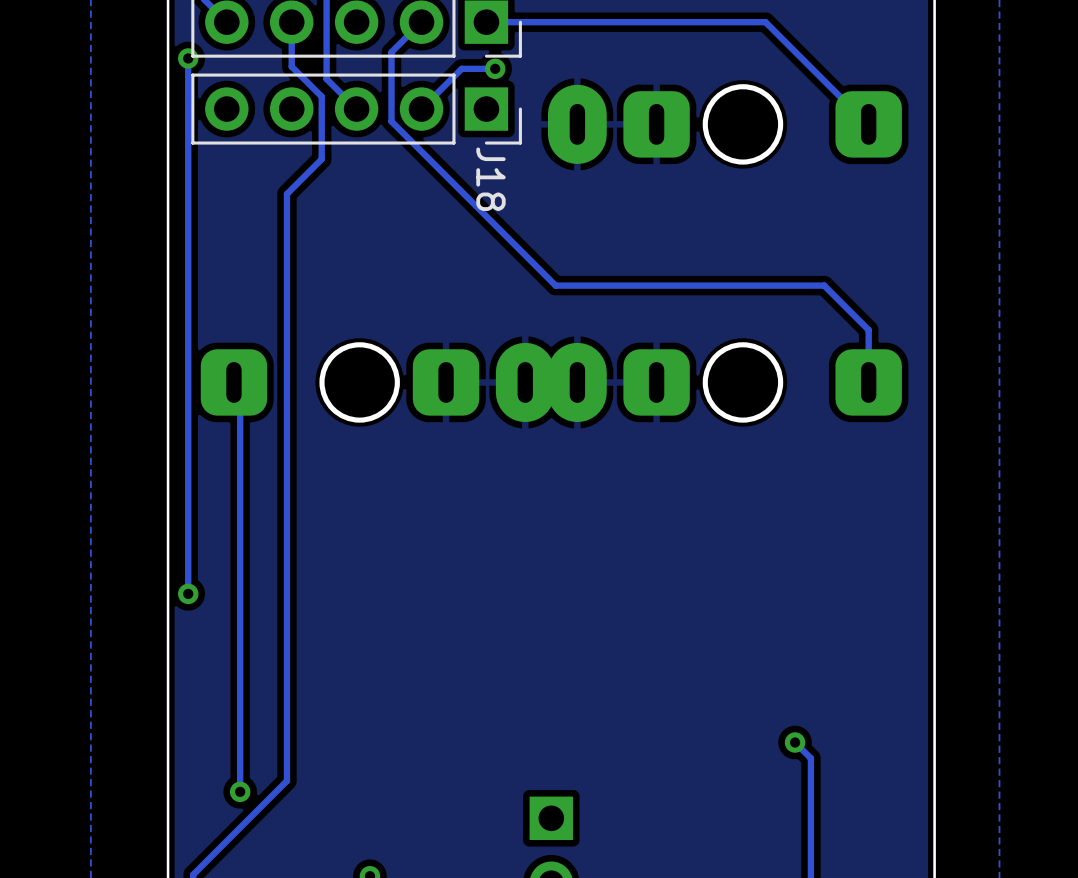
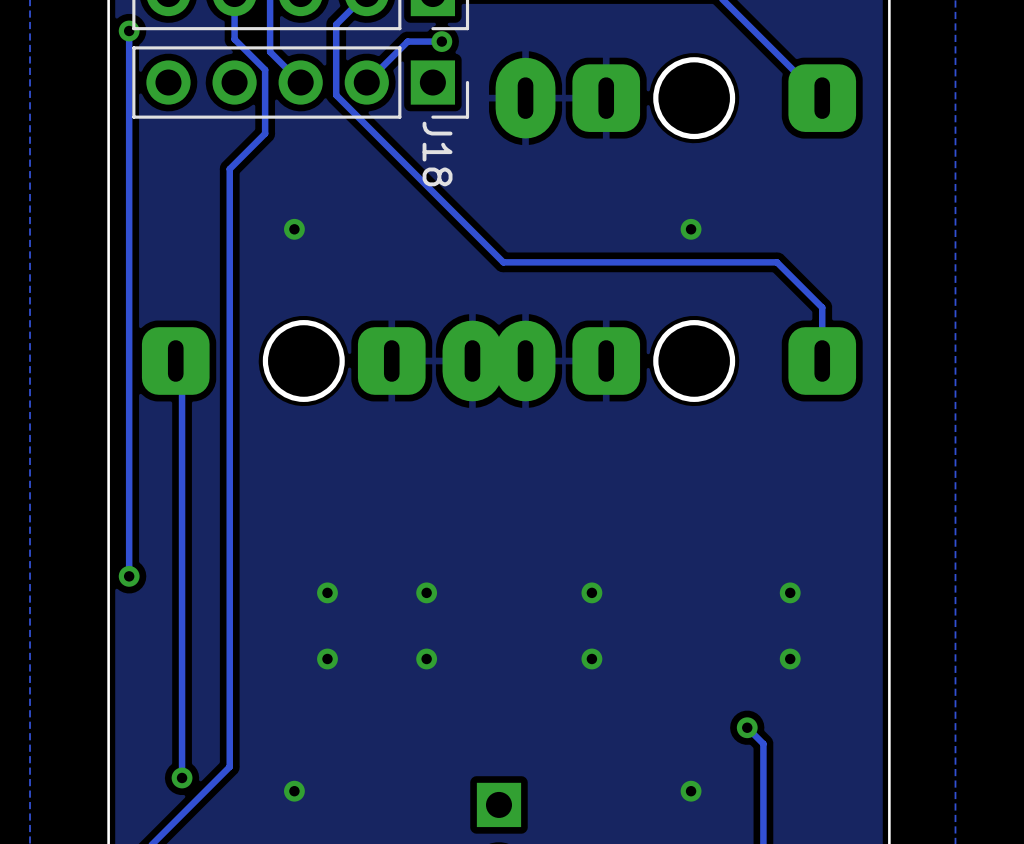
via: none -> (294, 229)
via: none -> (691, 229)
via: none -> (327, 592)
via: none -> (426, 592)
via: none -> (591, 592)
via: none -> (790, 592)
via: none -> (327, 658)
via: none -> (426, 658)
via: none -> (591, 658)
via: none -> (790, 658)
via: none -> (294, 791)
via: none -> (691, 791)

